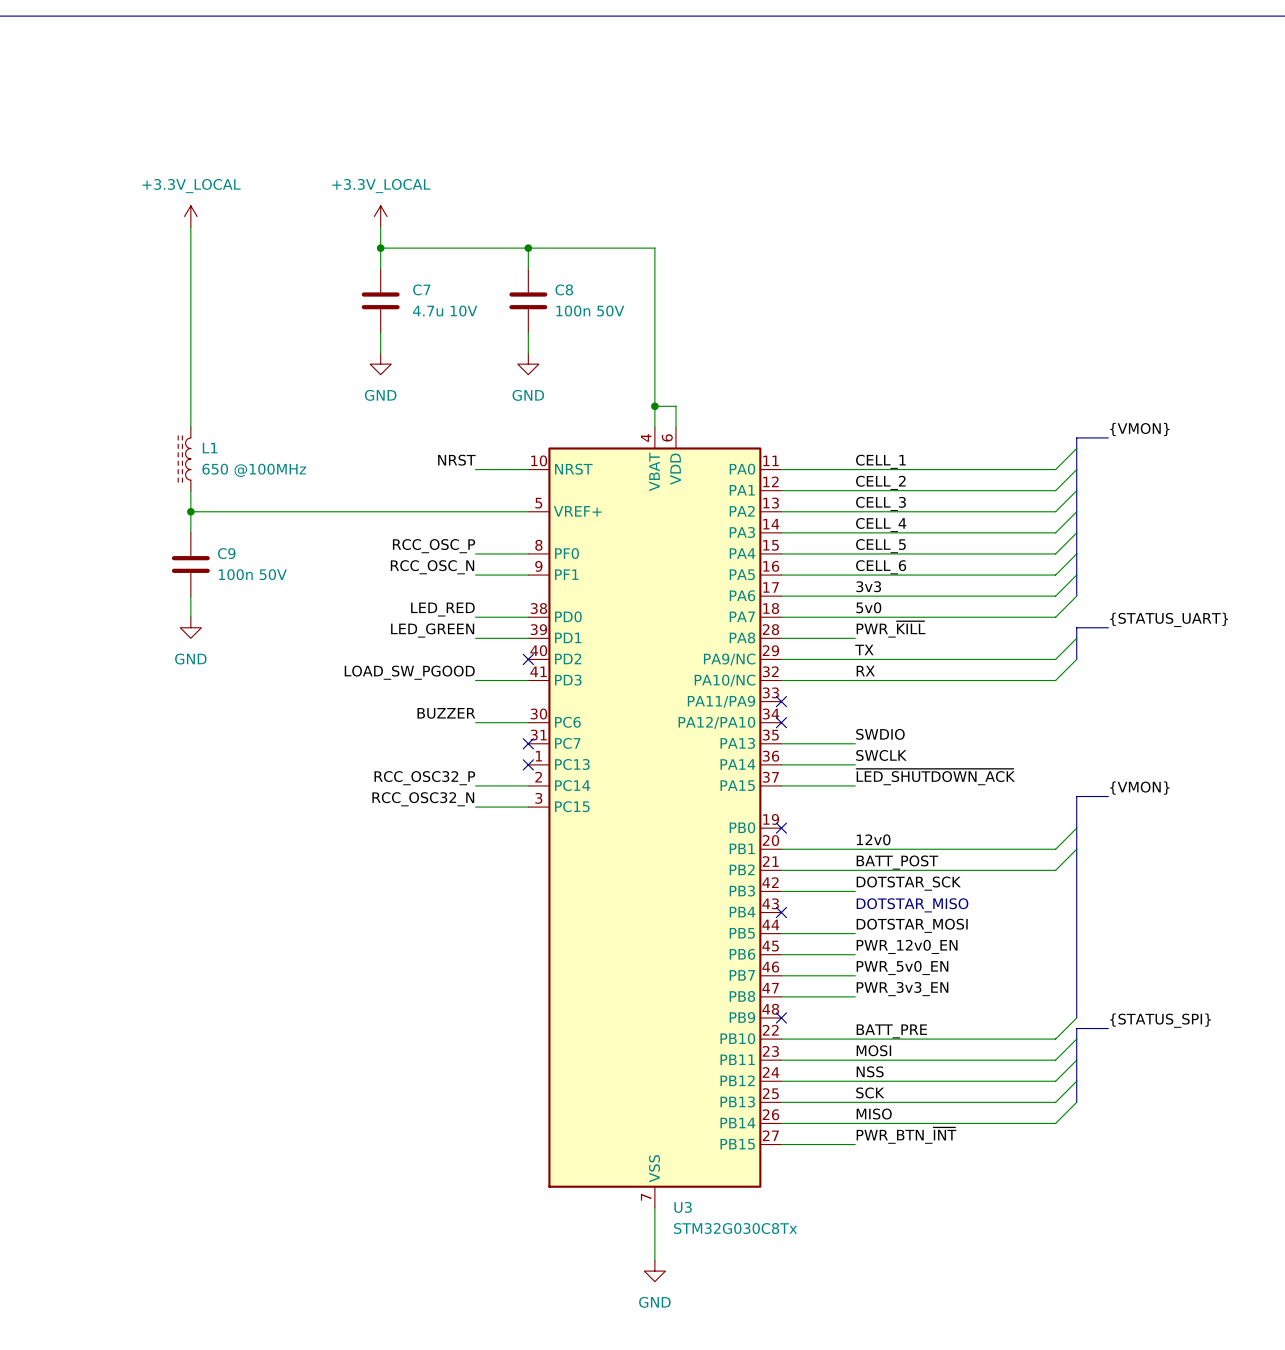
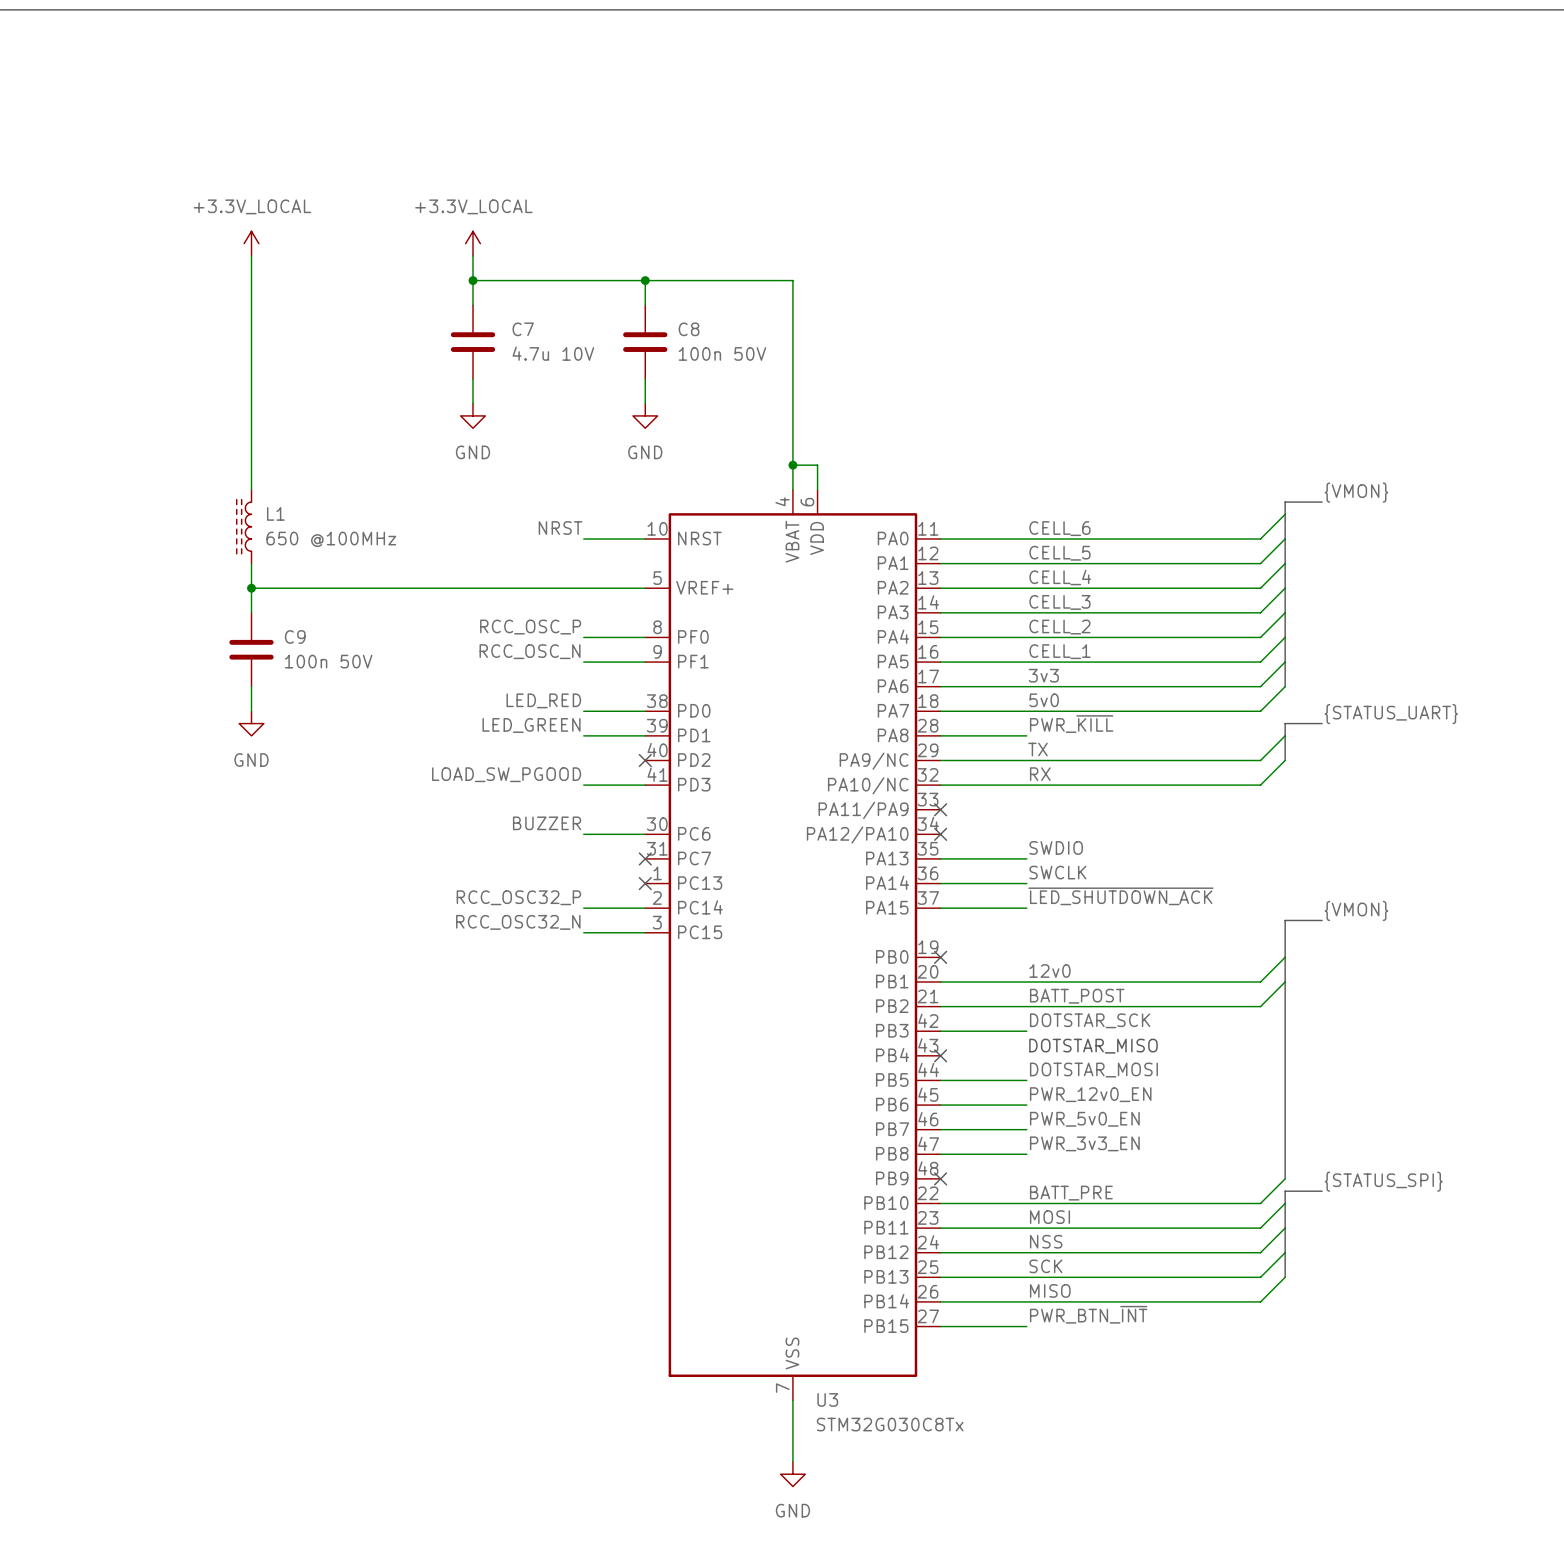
label: CELL_1 (880, 461) -> CELL_6 (1059, 528)
label: CELL_2 (880, 482) -> CELL_5 (1059, 553)
label: CELL_3 (880, 503) -> CELL_4 (1060, 577)
label: CELL_4 (881, 525) -> CELL_3 (1059, 602)
label: CELL_5 (880, 546) -> CELL_2 (1059, 627)
label: CELL_6 (881, 567) -> CELL_1 (1059, 651)

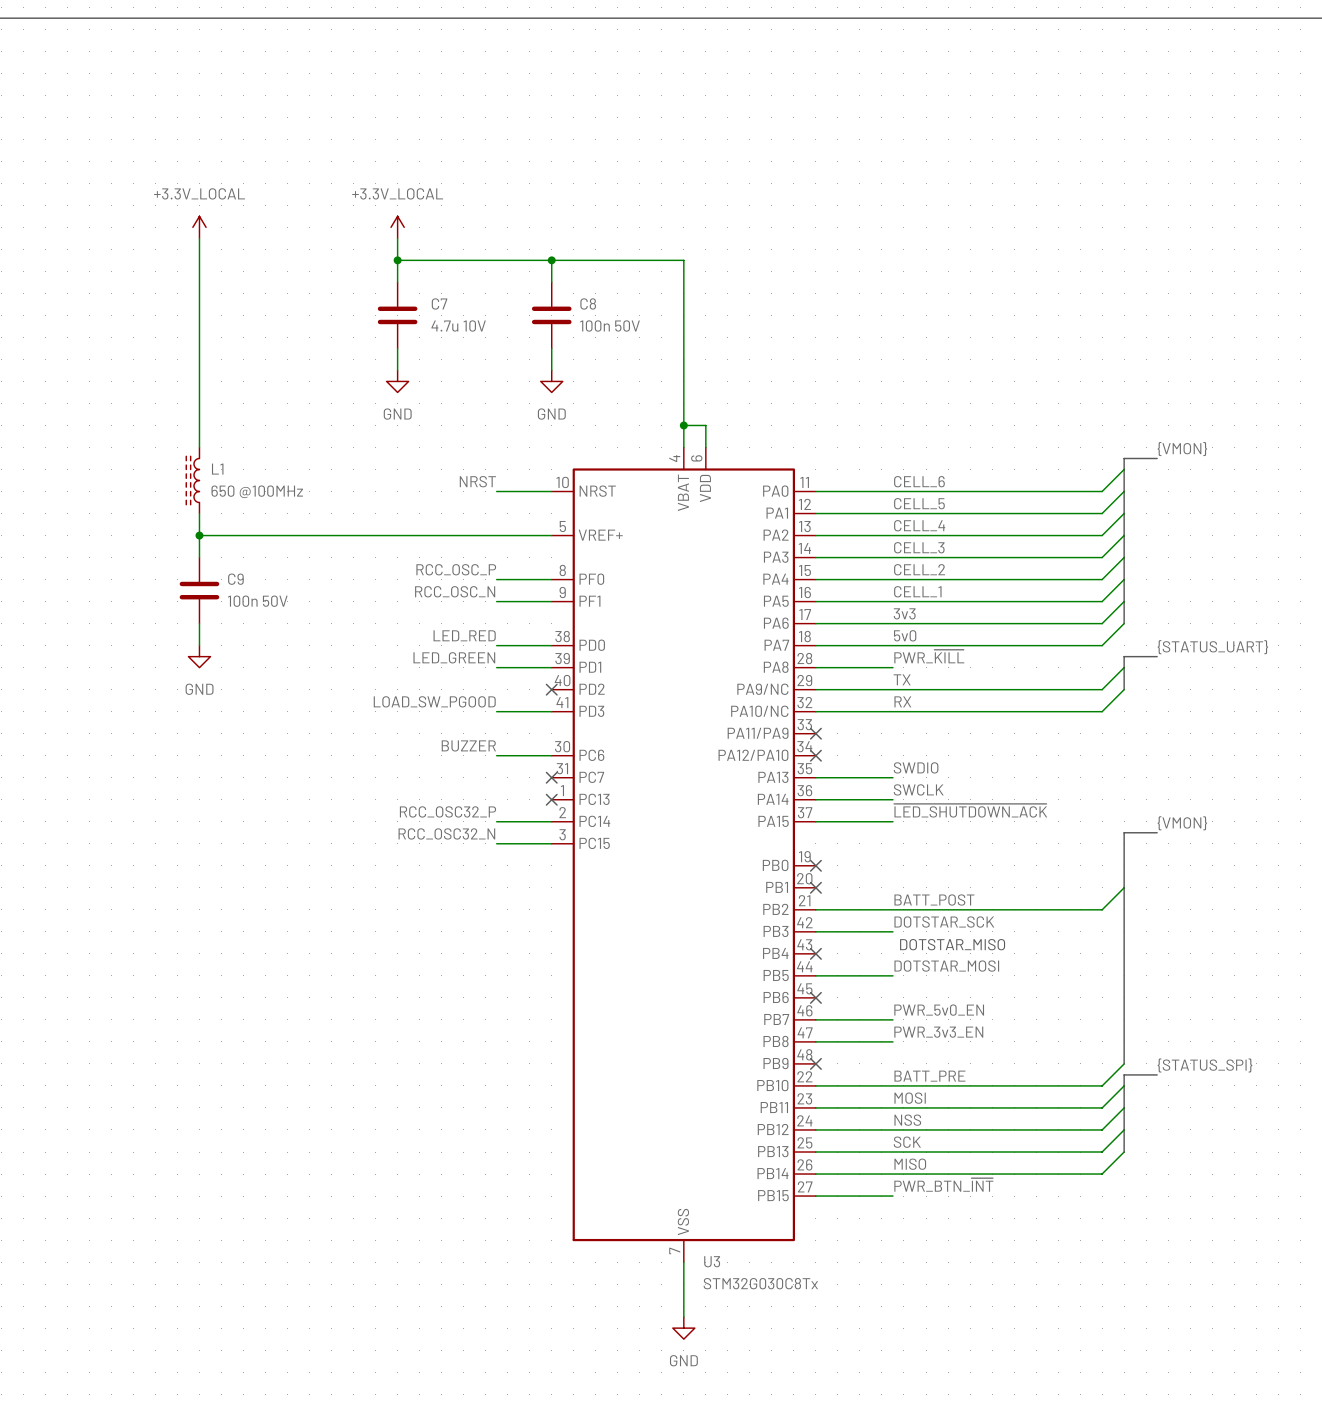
wire: (1285, 957) (1260, 981) (940, 981) -> none
label: 12v0 (1049, 971) -> none
no-connect mark: none -> (815, 887)
label: PWR_12v0_EN (1090, 1094) -> none
wire: (940, 1105) (1026, 1105) -> none
no-connect mark: none -> (815, 997)

